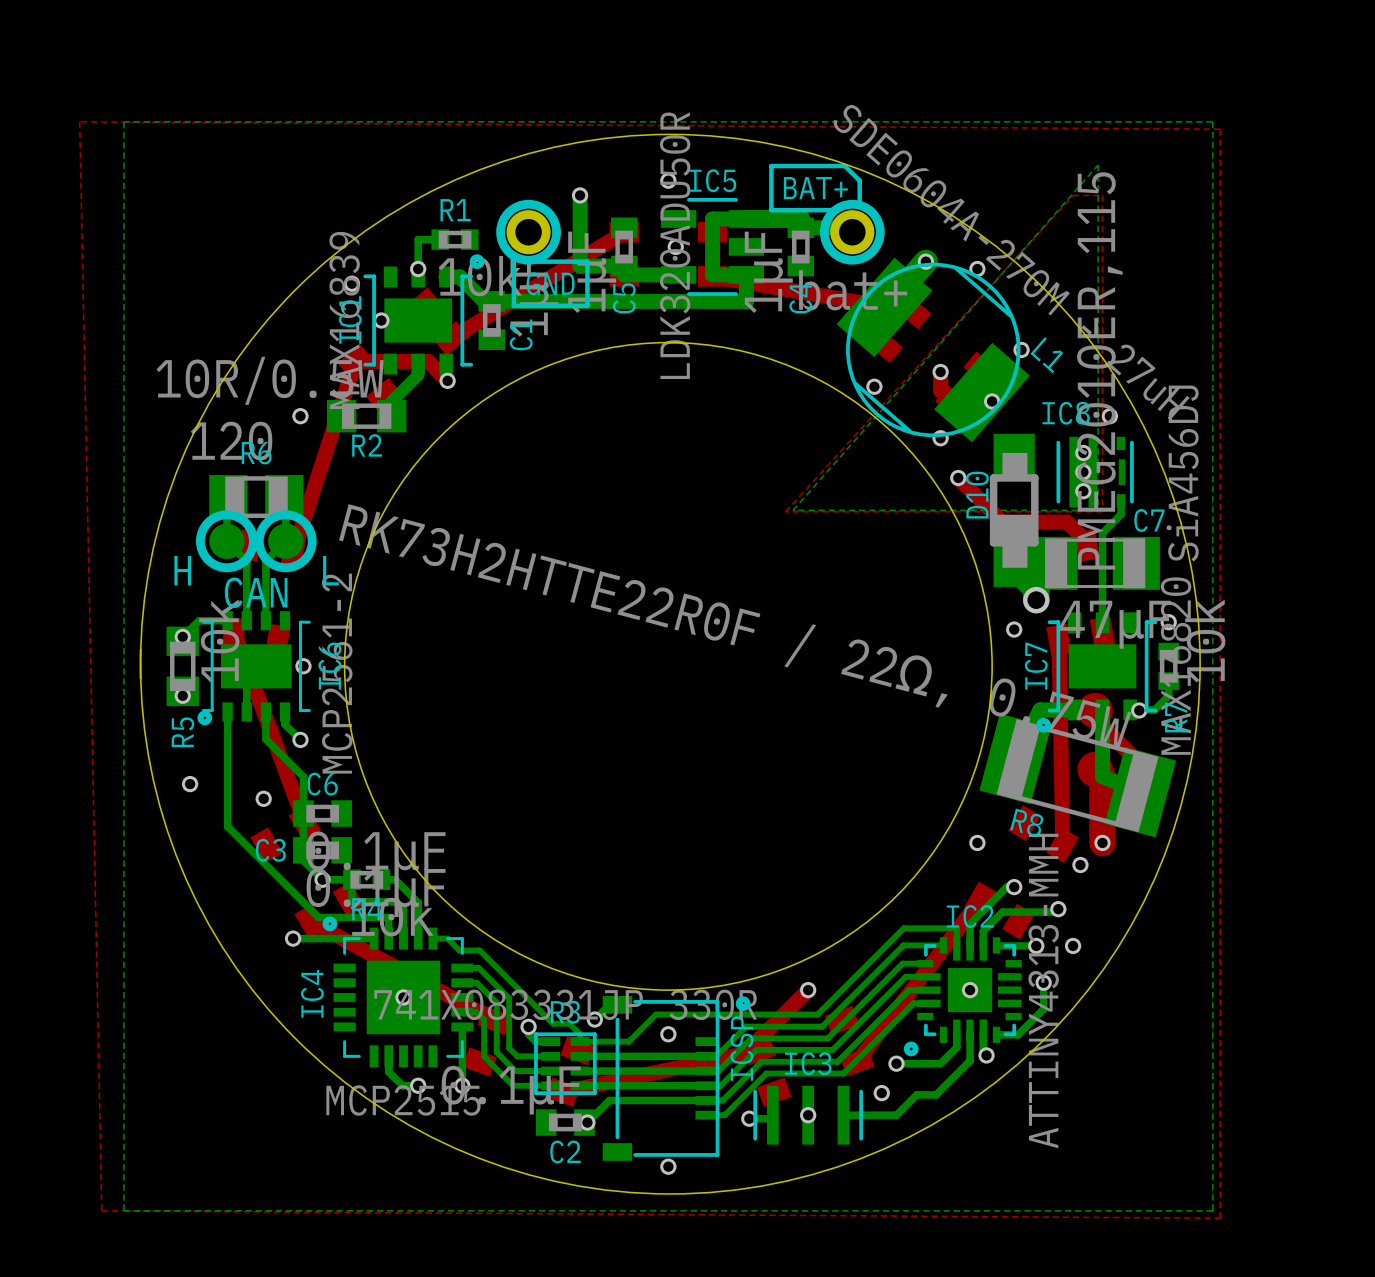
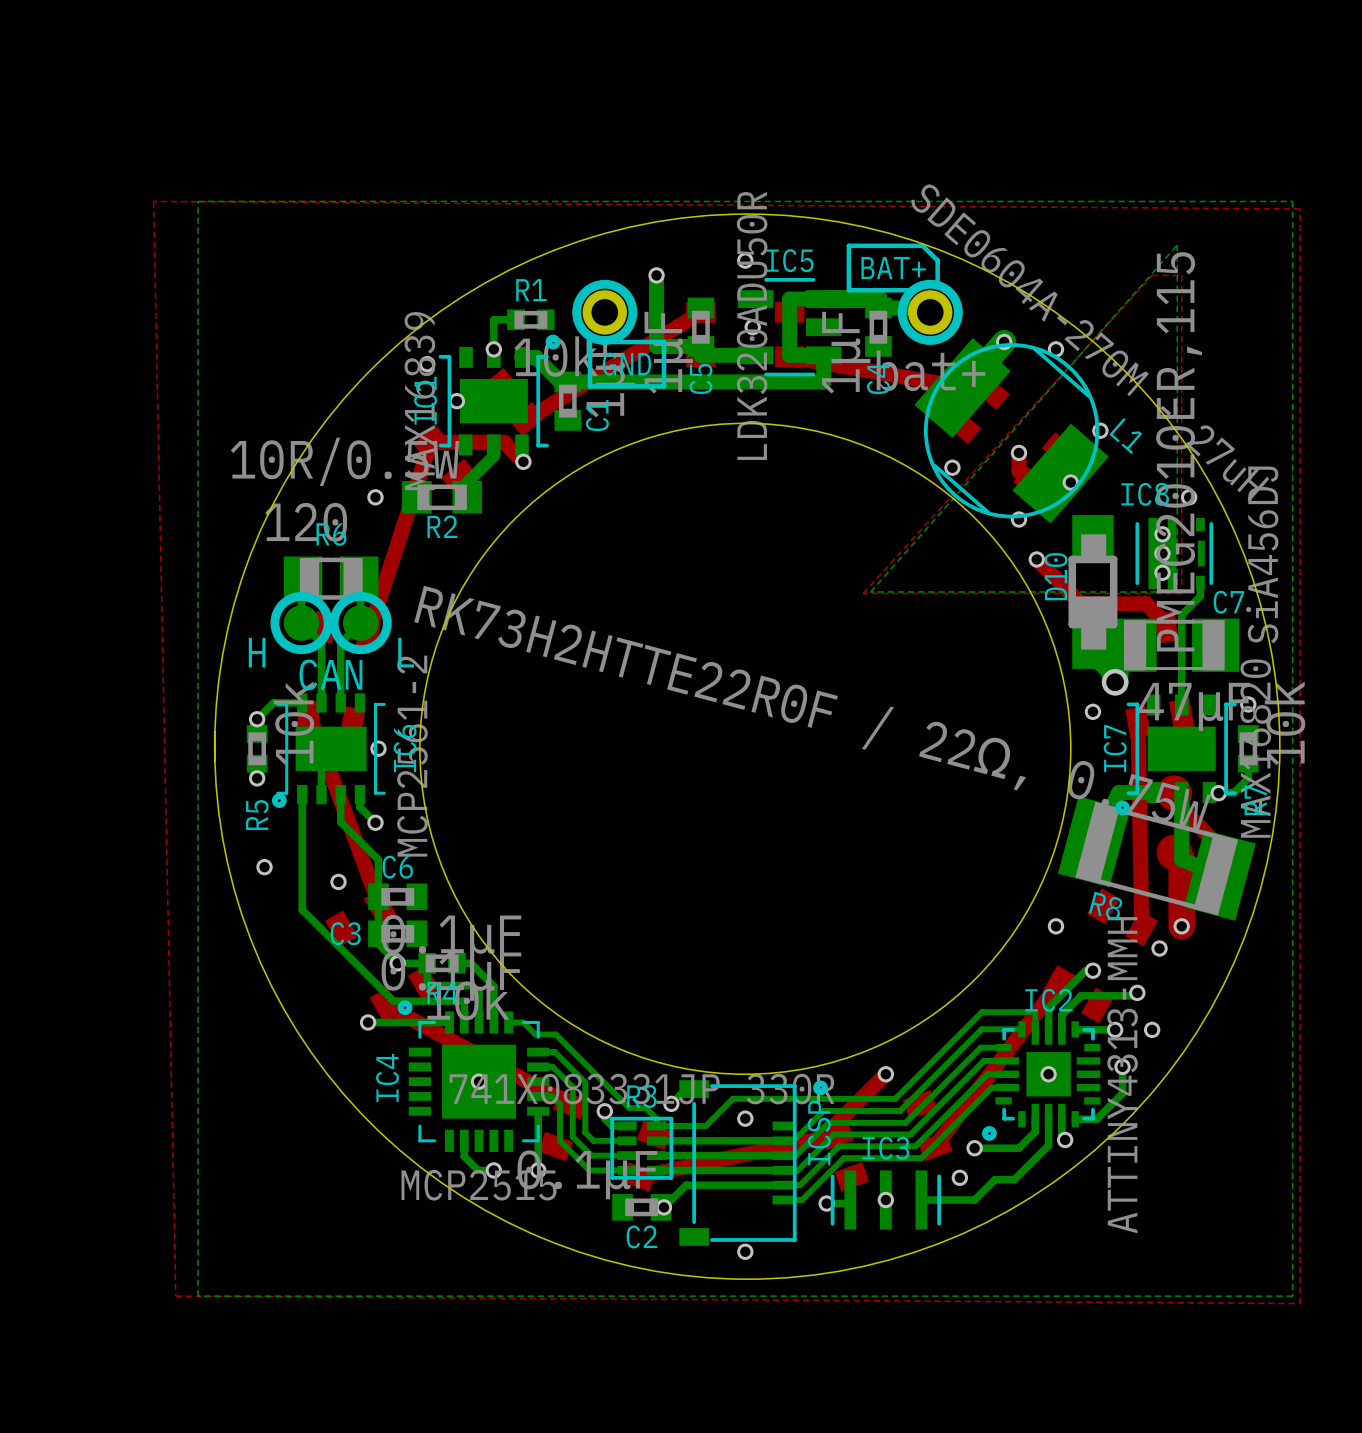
R5 footprint: [166, 626, 199, 707] -> [246, 725, 268, 773]

